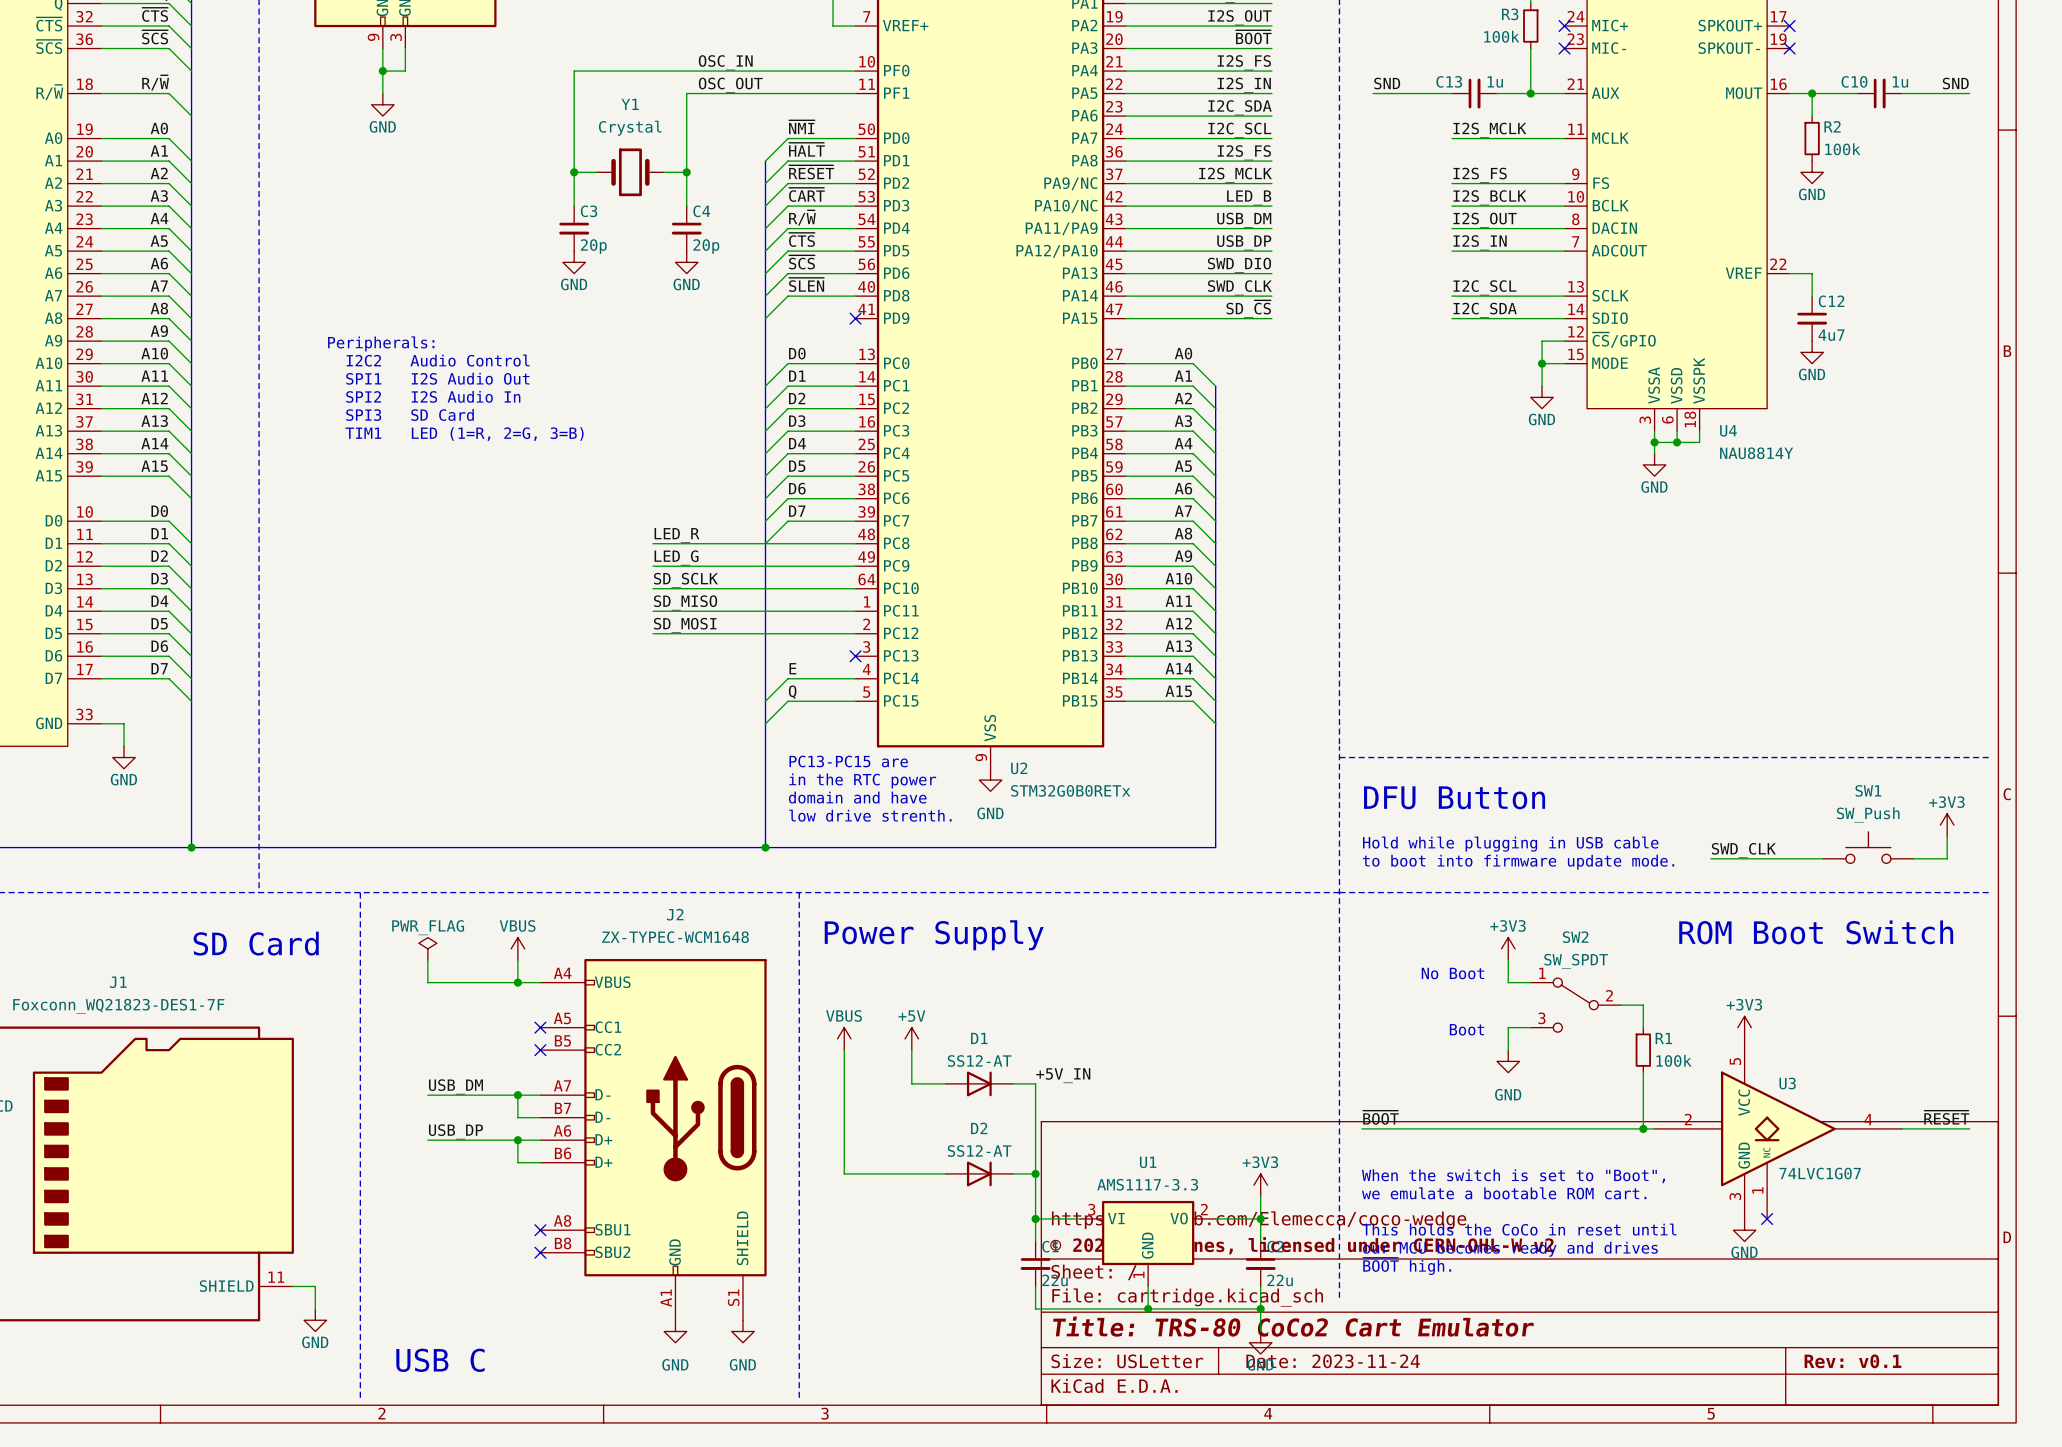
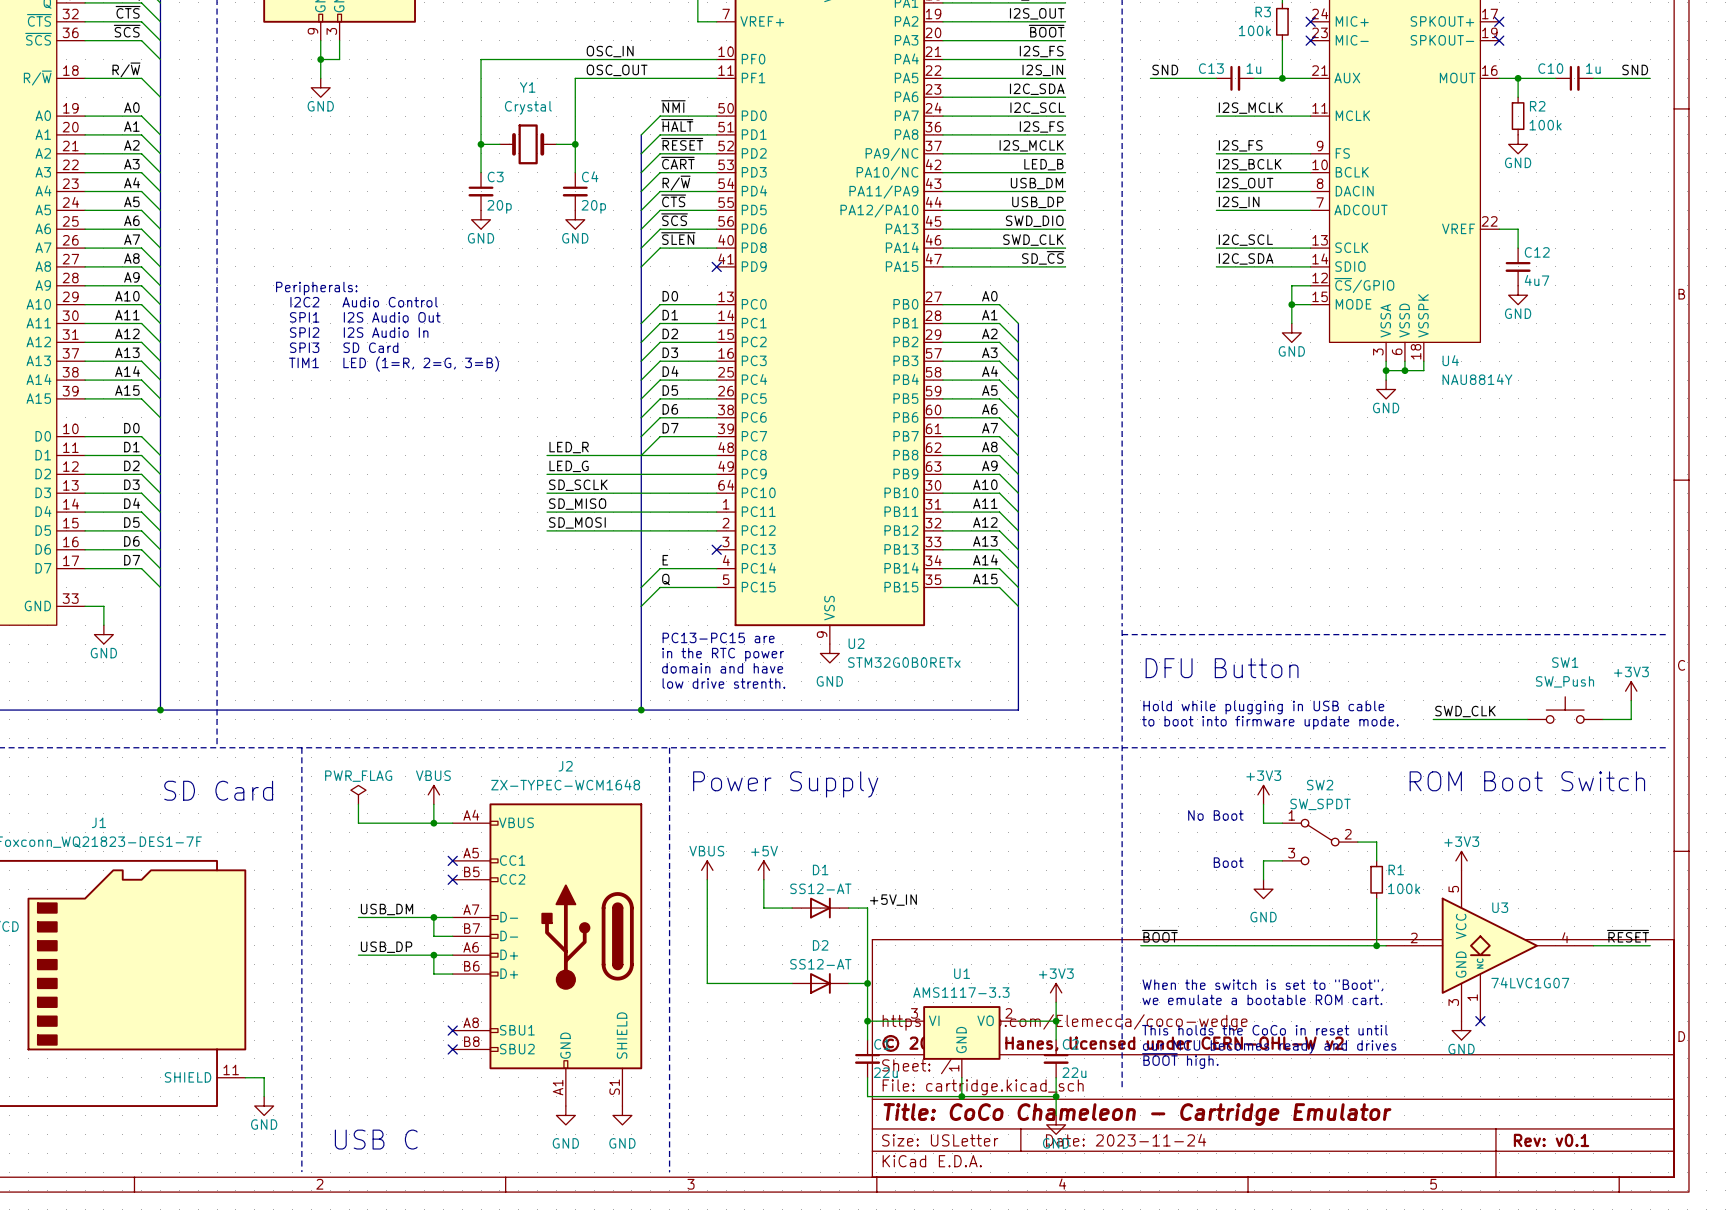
title block: Title: TRS-80 CoCo2 Cart Emulator (1293, 1326) -> Title: CoCo Chameleon - Cartridge Emulator (1137, 1114)

